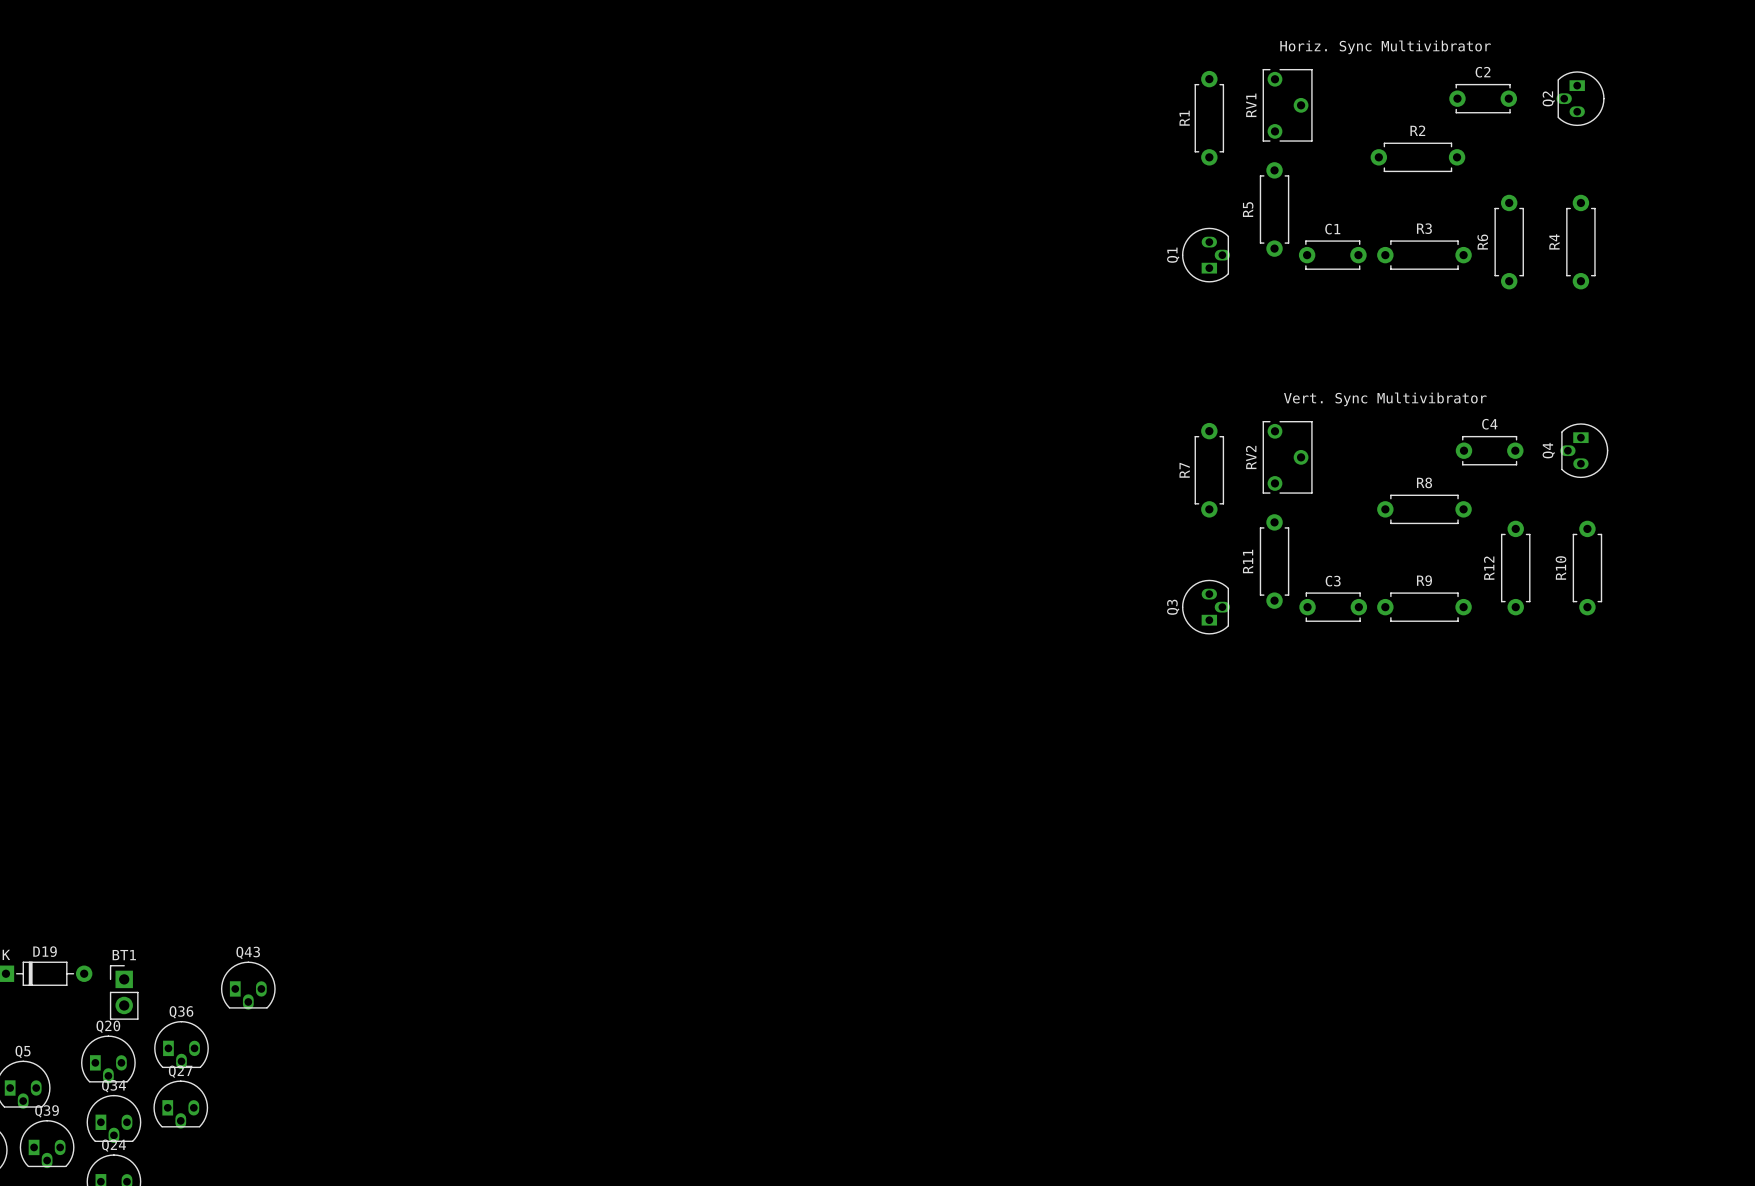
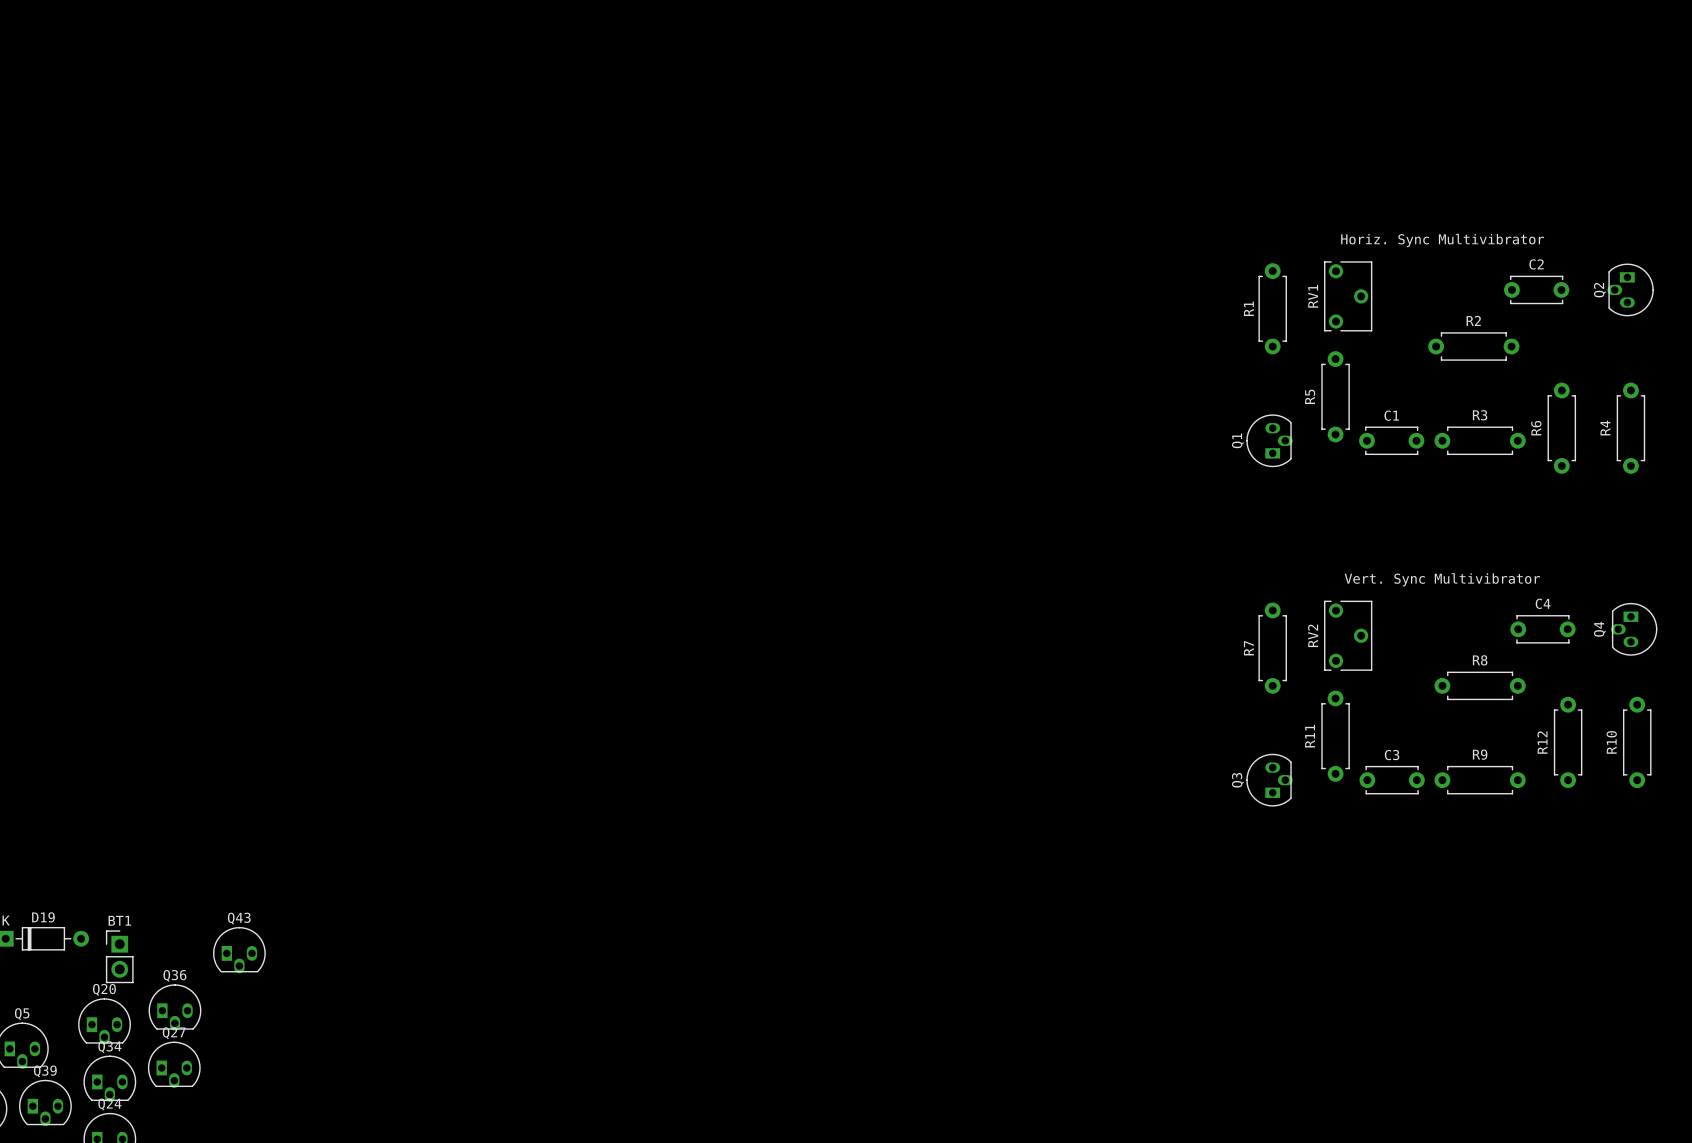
text position: Horiz. Sync Multivibrator (1385, 47) -> Horiz. Sync Multivibrator (1442, 240)
C2 position: (1483, 98) -> (1536, 289)
Q2 position: (1580, 98) -> (1630, 289)
RV1 position: (1287, 105) -> (1348, 296)
R1 position: (1209, 118) -> (1272, 308)
R2 position: (1417, 157) -> (1473, 346)
R5 position: (1274, 209) -> (1335, 396)
R6 position: (1509, 242) -> (1561, 428)
R4 position: (1580, 242) -> (1630, 428)
Q1 position: (1206, 255) -> (1269, 440)
C1 position: (1332, 255) -> (1391, 440)
R3 position: (1424, 255) -> (1480, 440)
text position: Vert. Sync Multivibrator (1385, 399) -> Vert. Sync Multivibrator (1442, 579)
C4 position: (1489, 450) -> (1542, 629)
Q4 position: (1584, 450) -> (1634, 629)
RV2 position: (1287, 457) -> (1348, 635)
R7 position: (1209, 470) -> (1272, 648)
R8 position: (1424, 509) -> (1480, 685)
R11 position: (1274, 561) -> (1335, 736)
R12 position: (1515, 568) -> (1568, 742)
R10 position: (1587, 568) -> (1637, 742)
Q3 position: (1206, 607) -> (1269, 780)
C3 position: (1333, 607) -> (1392, 780)
R9 position: (1424, 607) -> (1480, 780)

